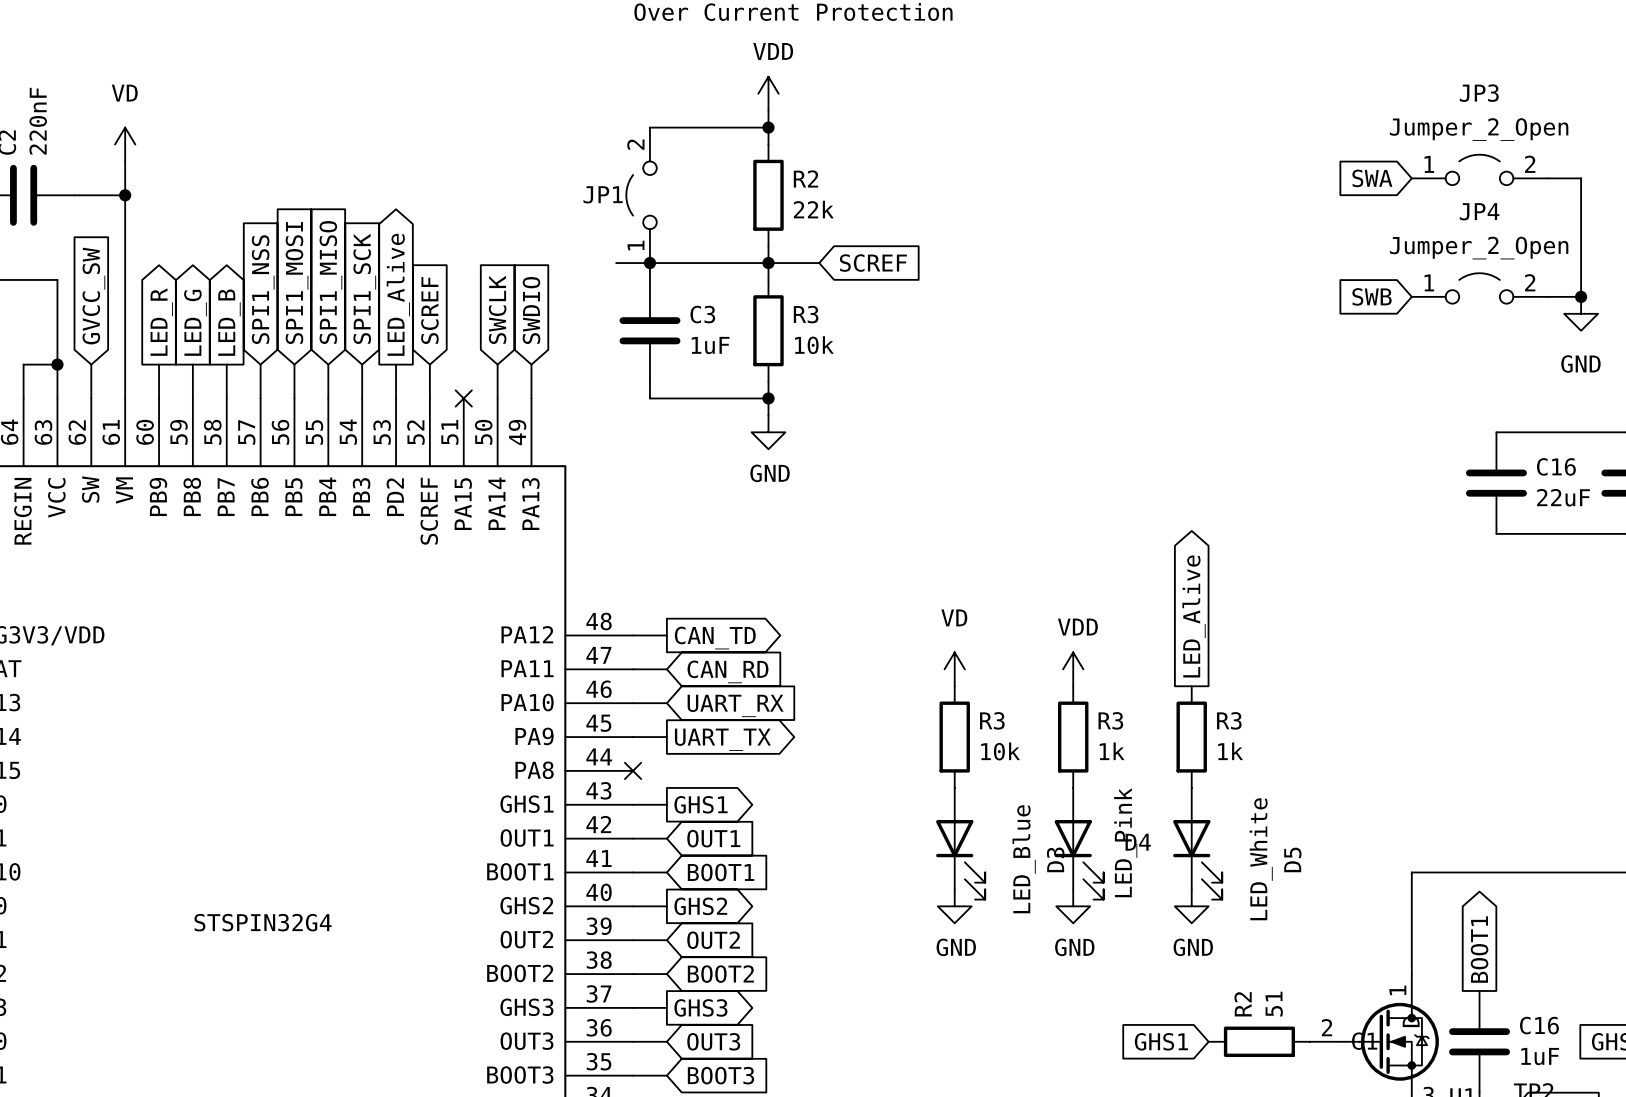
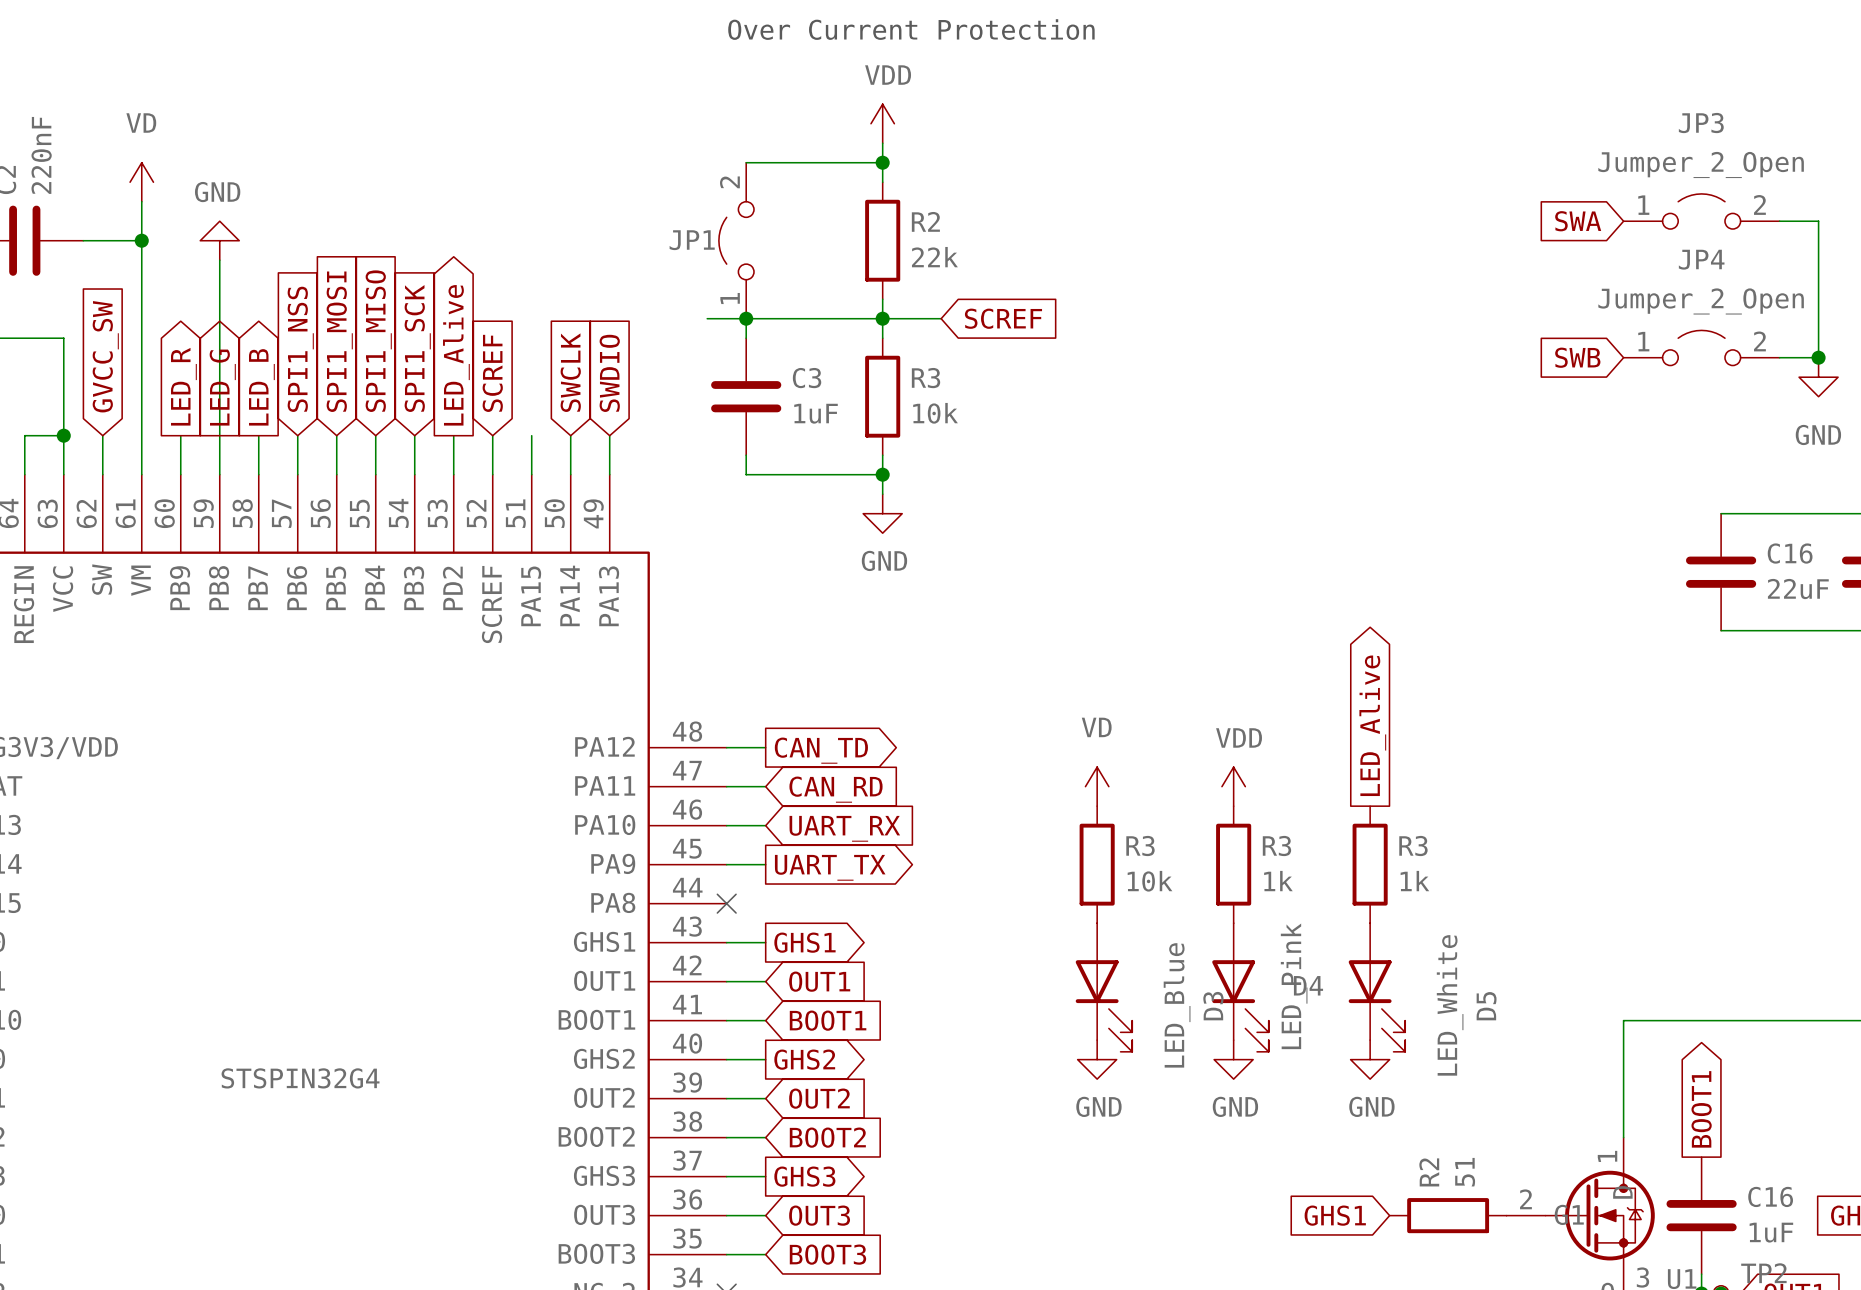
power symbol: none -> GND (219, 240)
wire: none -> (219, 260) (219, 435)
wire: none -> (531, 435) (531, 474)
no-connect mark: (463, 398) -> none

